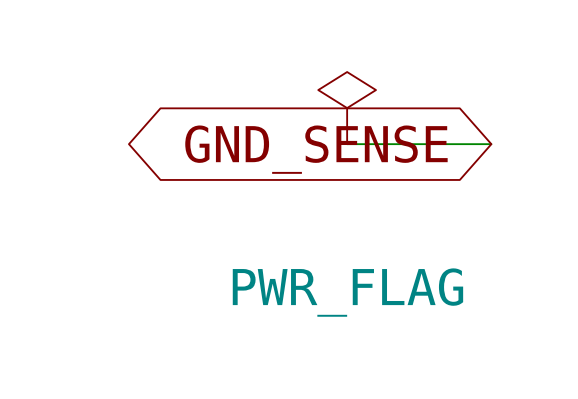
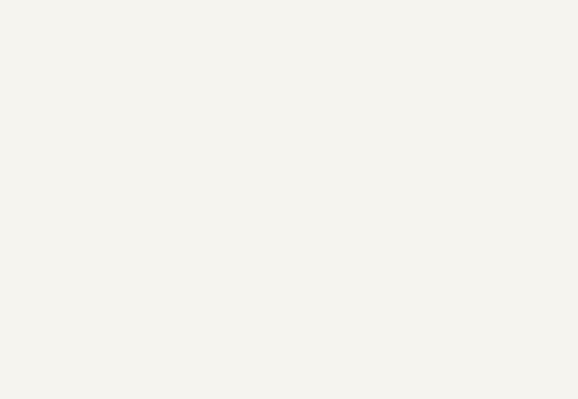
power symbol: PWR_FLAG (347, 108) -> none
wire: (347, 144) (491, 144) -> none
global label: GND_SENSE (316, 149) -> none

